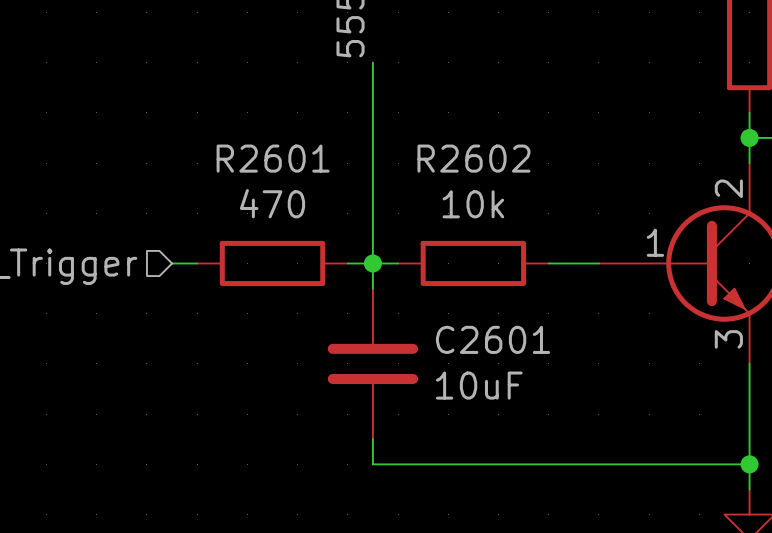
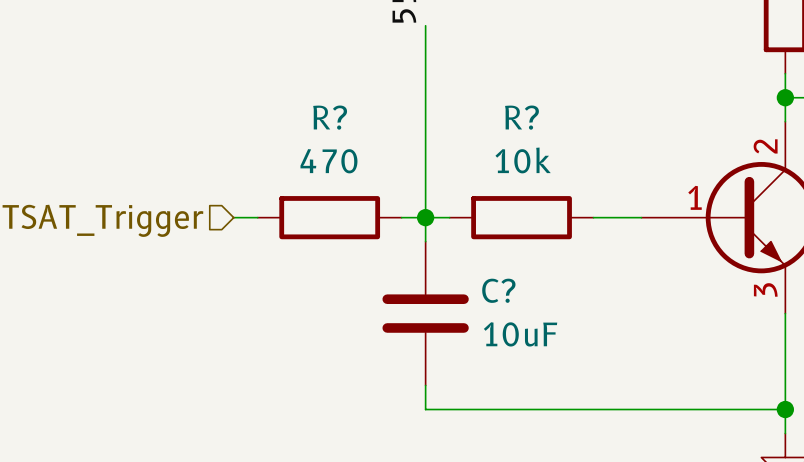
R2601 name: R2601 (273, 158) -> R? (330, 117)
R2602 name: R2602 (473, 158) -> R? (521, 117)
C2601 name: C2601 (493, 339) -> C? (498, 290)

